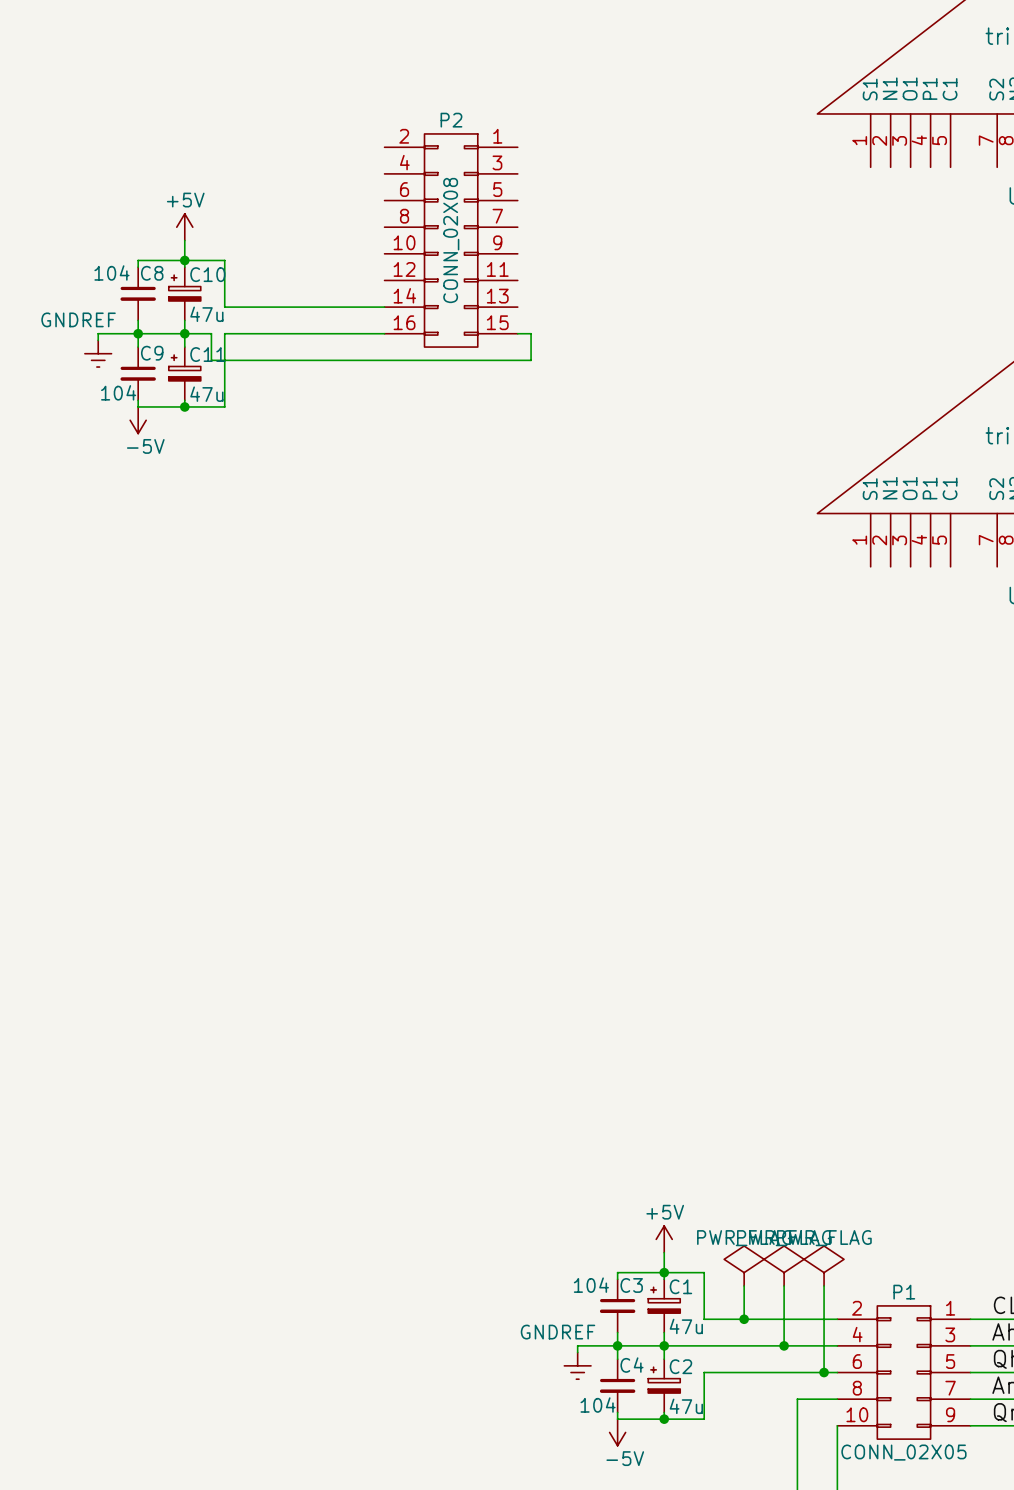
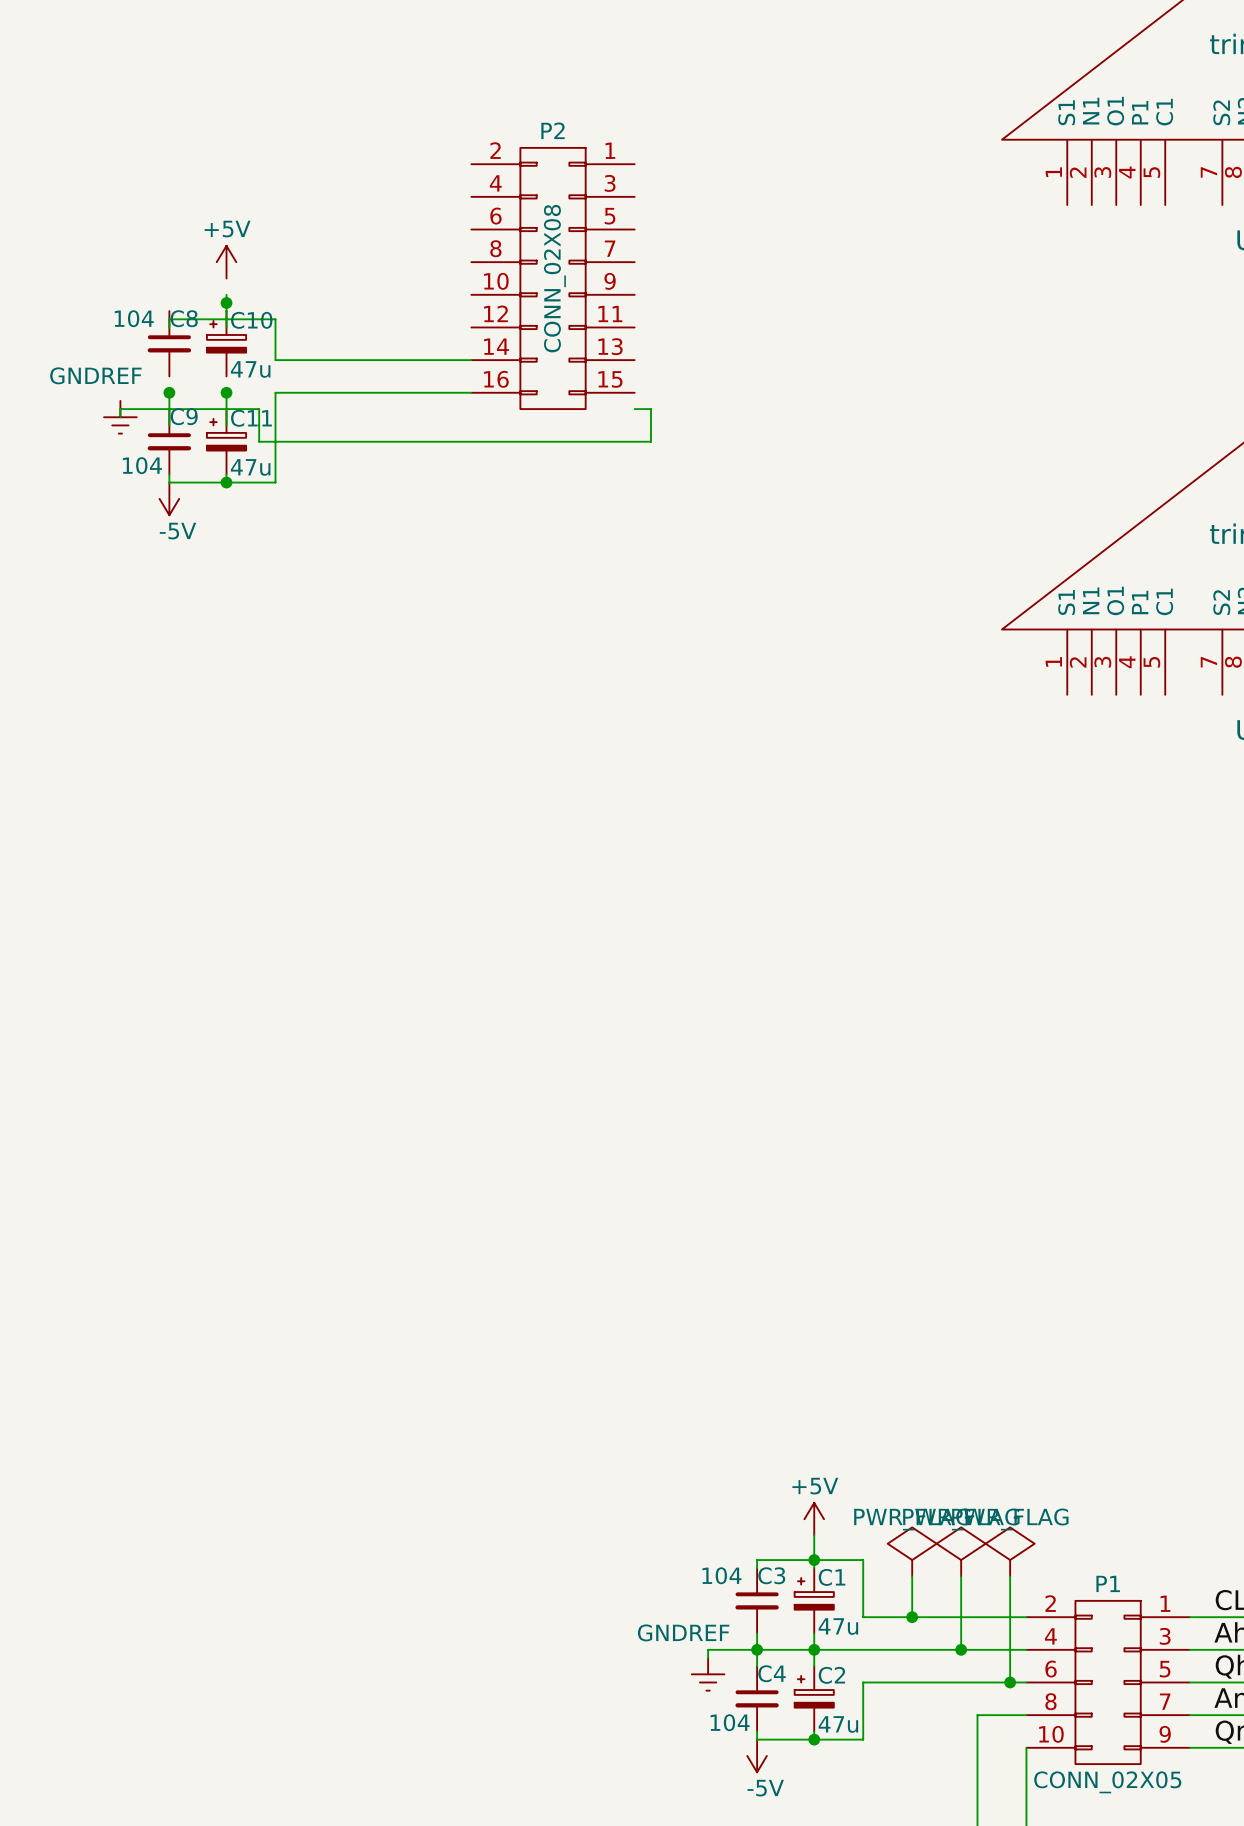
power symbol position: +5V (184, 227) -> +5V (226, 262)
P2 position: (451, 240) -> (553, 278)
junction position: (184, 260) -> (226, 302)
C8 position: (138, 293) -> (169, 343)
C10 position: (184, 293) -> (226, 343)
wire: (224, 293) (224, 307) (384, 307) -> (275, 360) (471, 360)
junction position: (138, 333) -> (169, 392)
junction position: (184, 333) -> (226, 392)
wire: (224, 333) (384, 333) -> (275, 409) (275, 392) (471, 392)
power symbol position: GNDREF (98, 353) -> GNDREF (120, 417)
C9 position: (138, 373) -> (169, 441)
C11 position: (184, 373) -> (226, 441)
wire: (224, 393) (224, 406) (138, 406) (138, 400) -> (275, 482) (169, 482) (169, 474)
junction position: (184, 406) -> (226, 482)
power symbol position: -5V (138, 420) -> -5V (169, 498)

